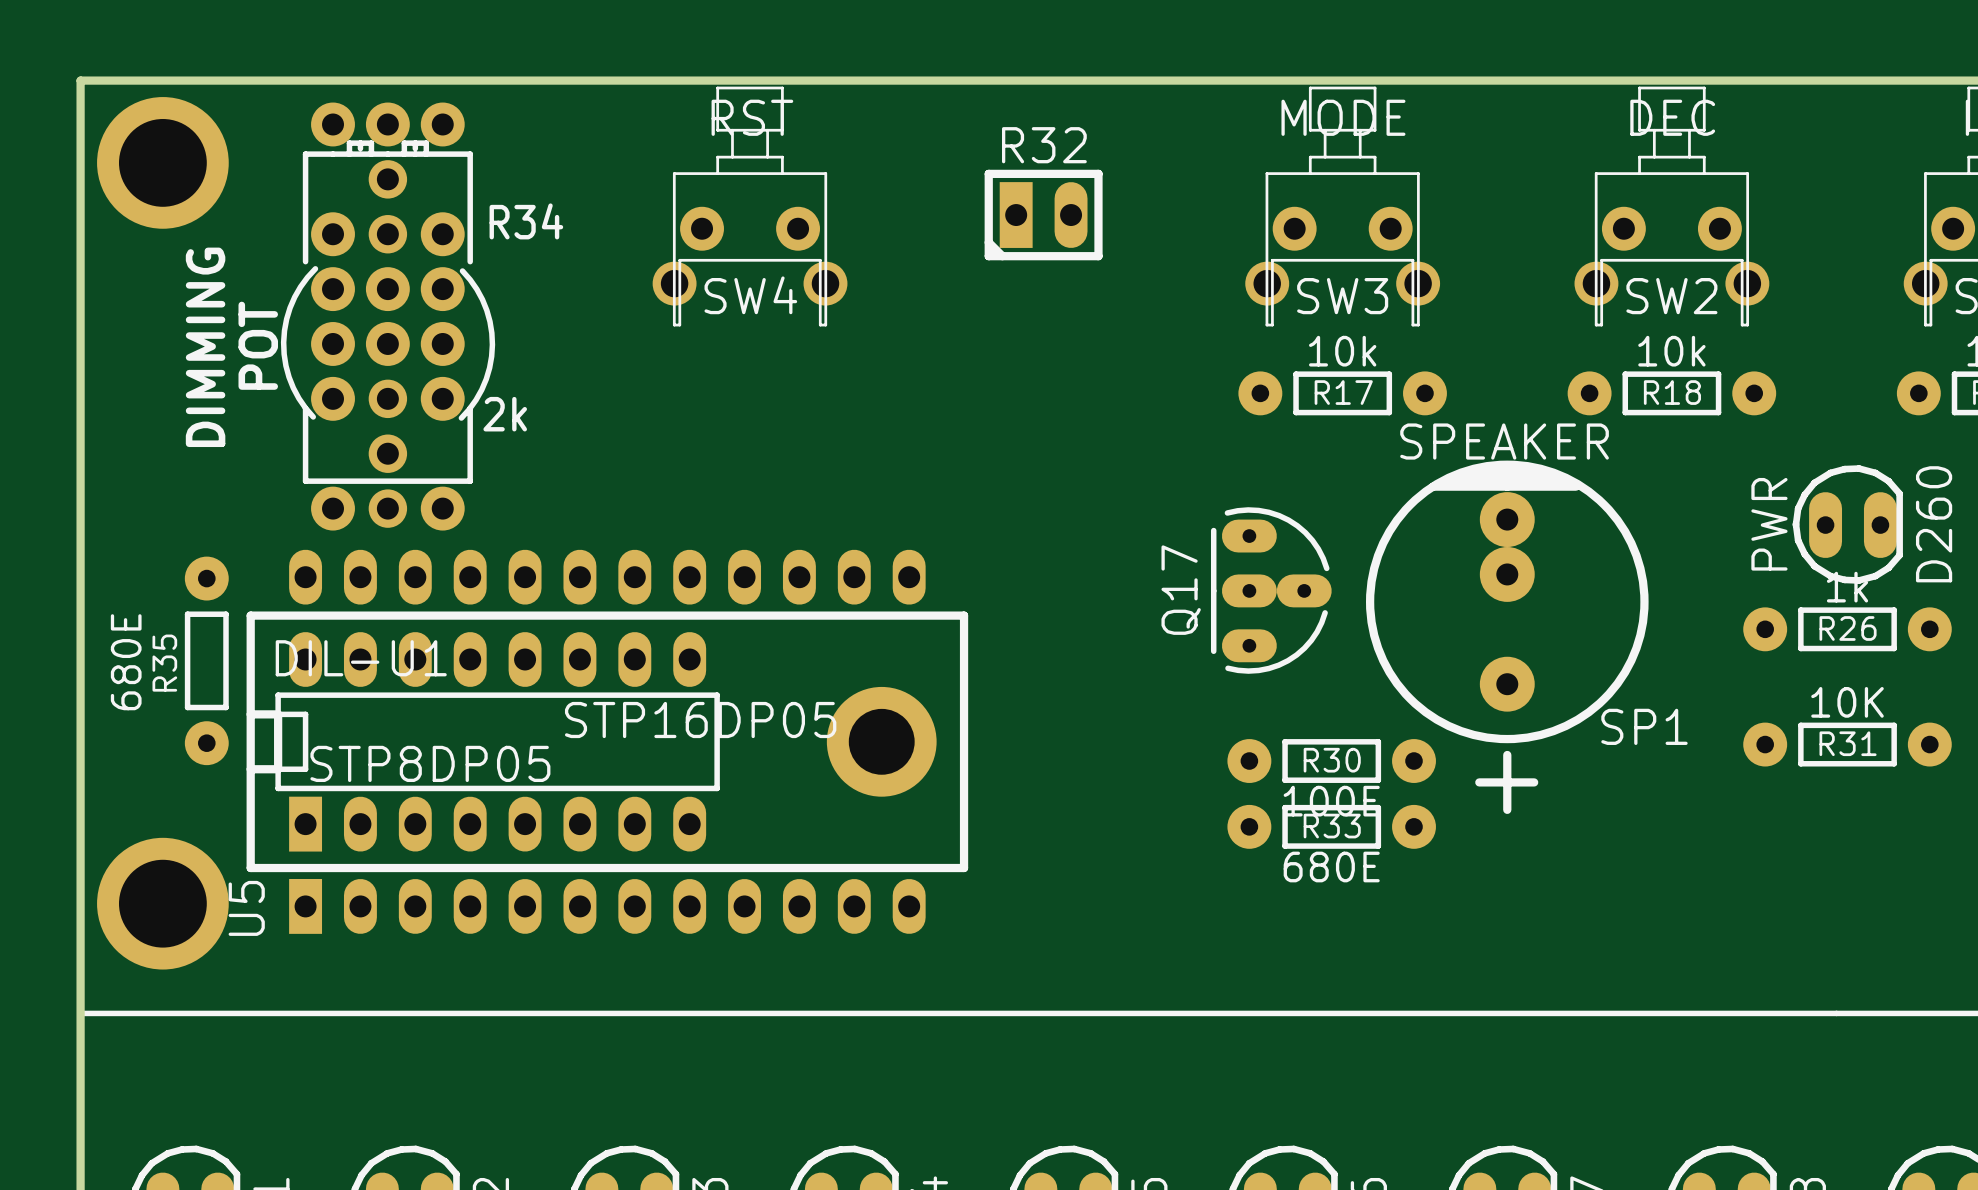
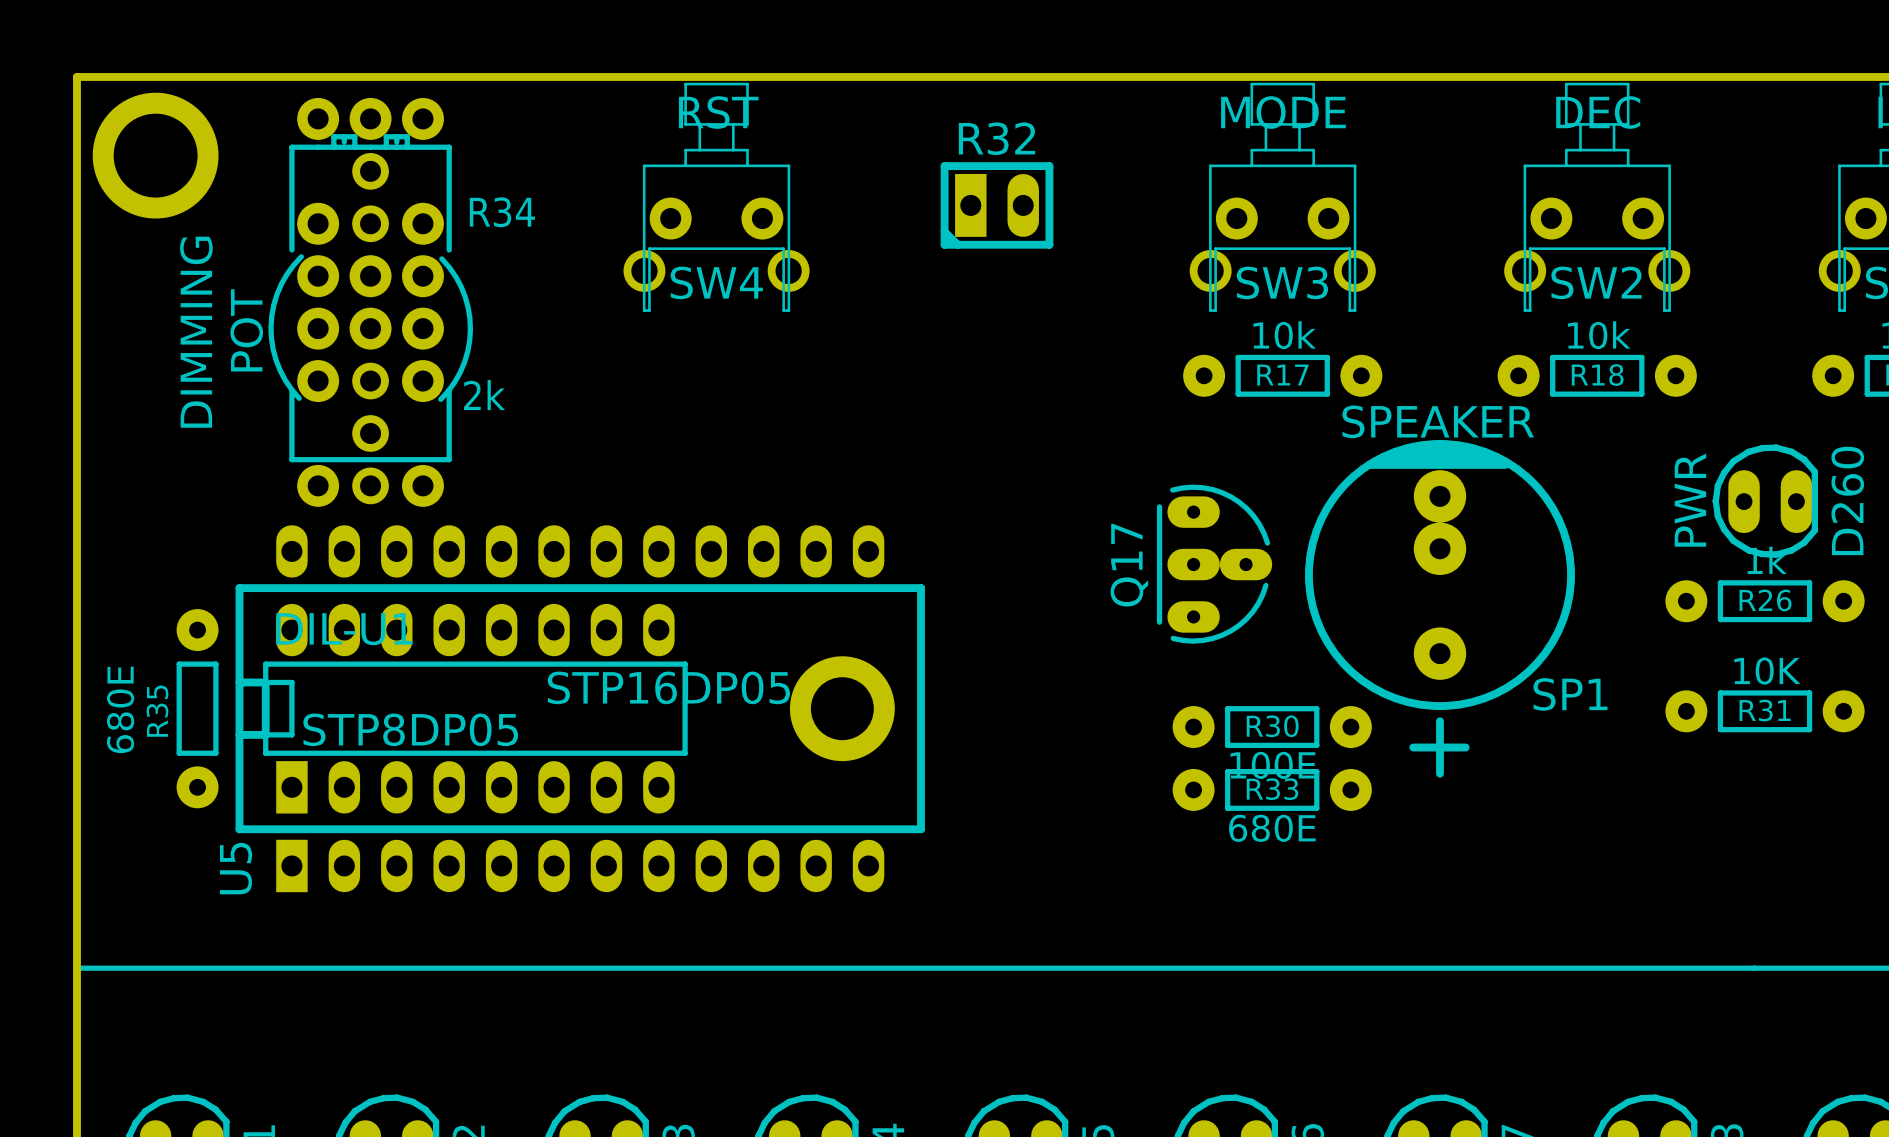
R35 position: (206, 660) -> (197, 708)
part: (162, 903) -> none

